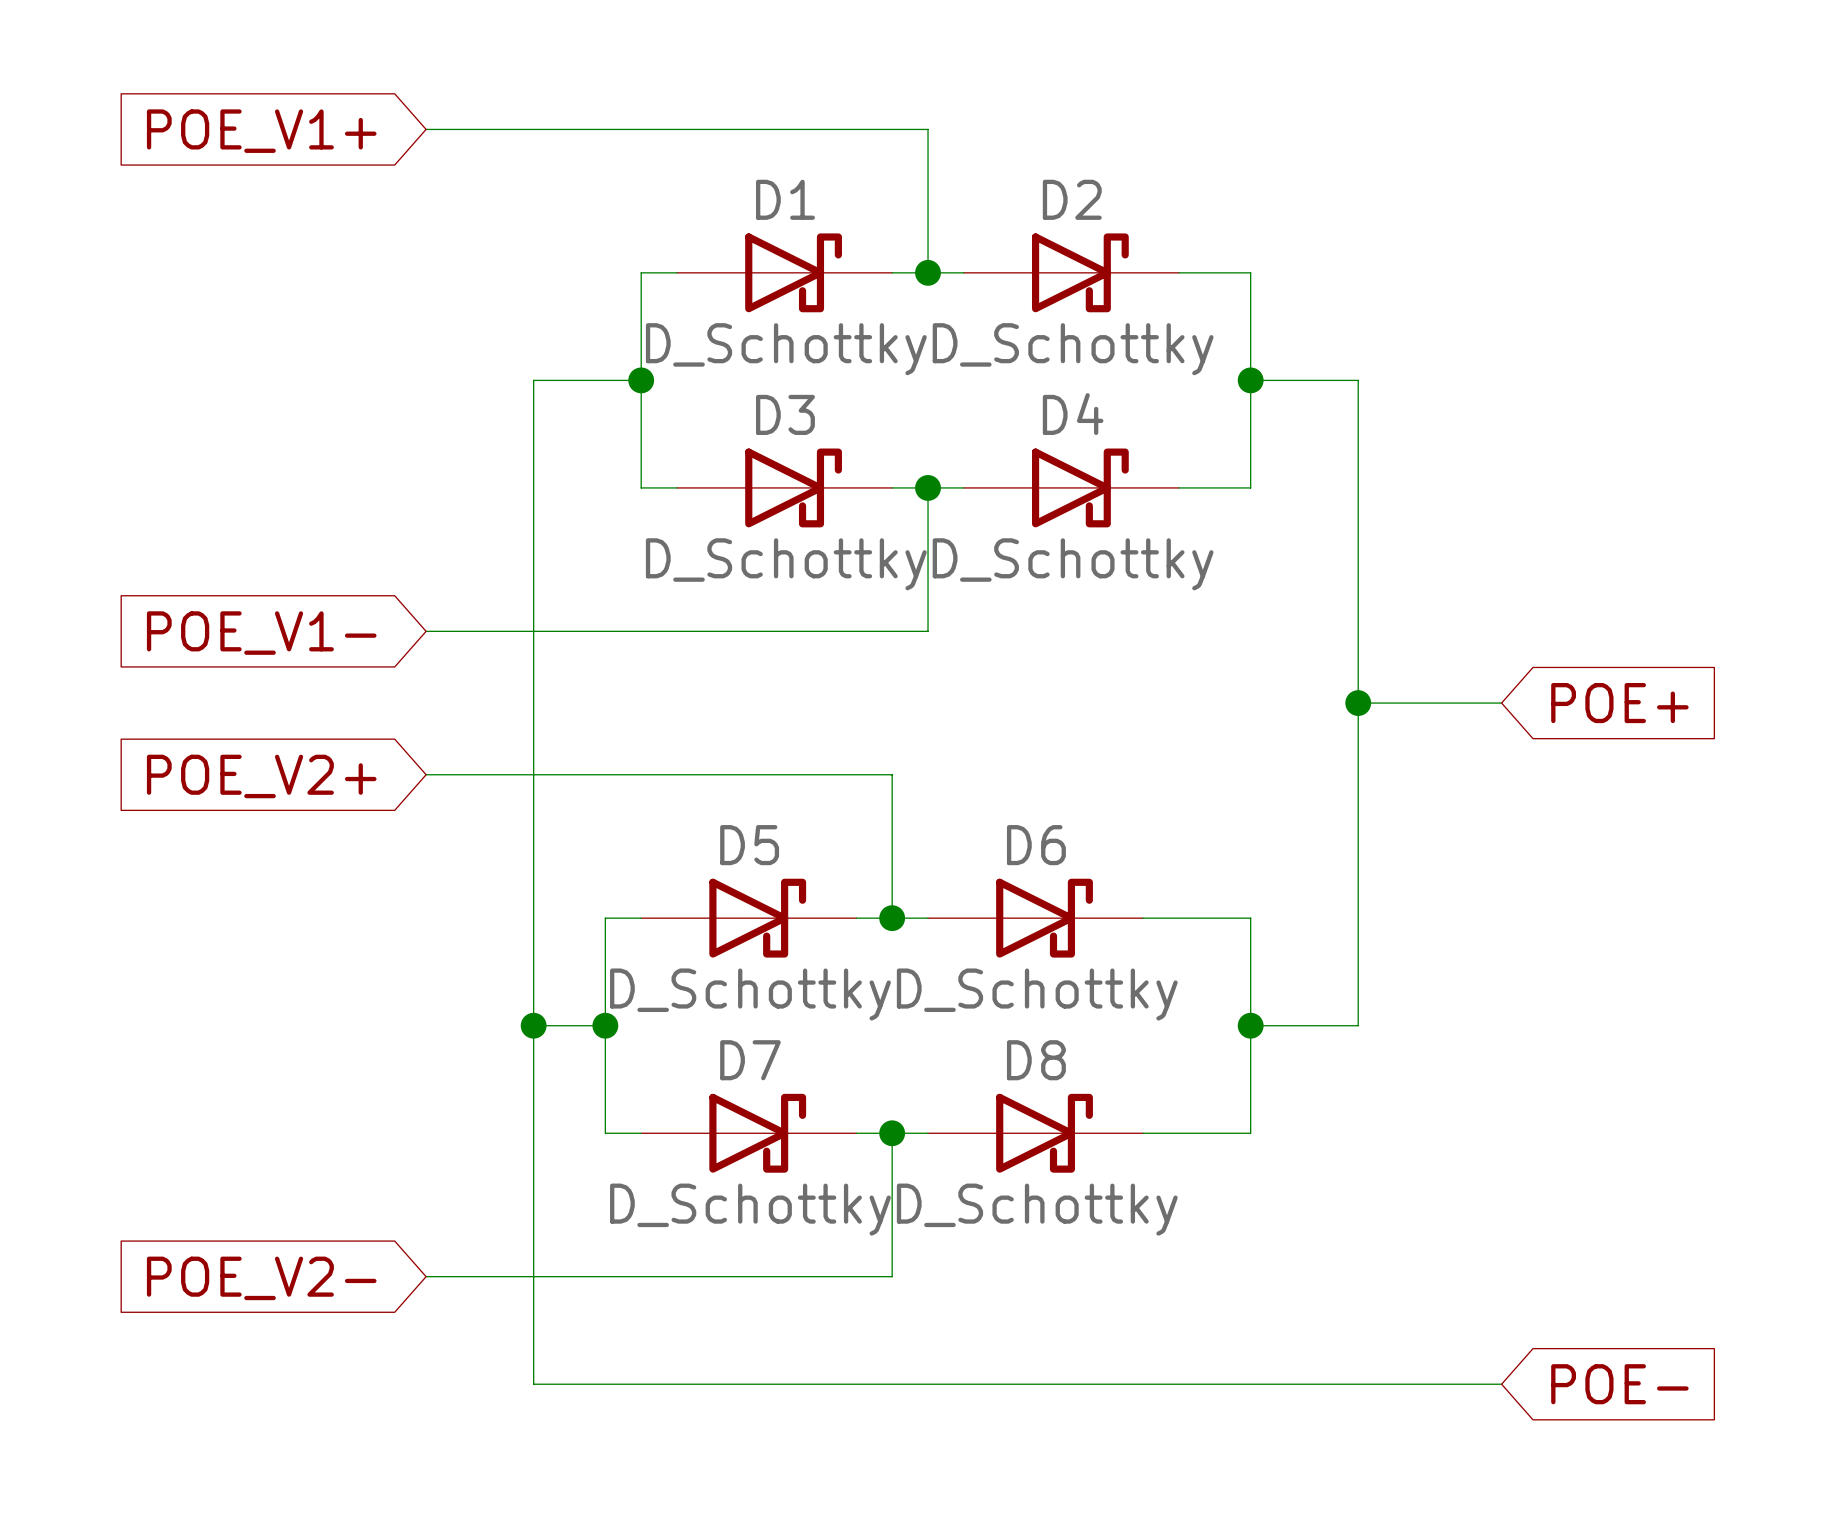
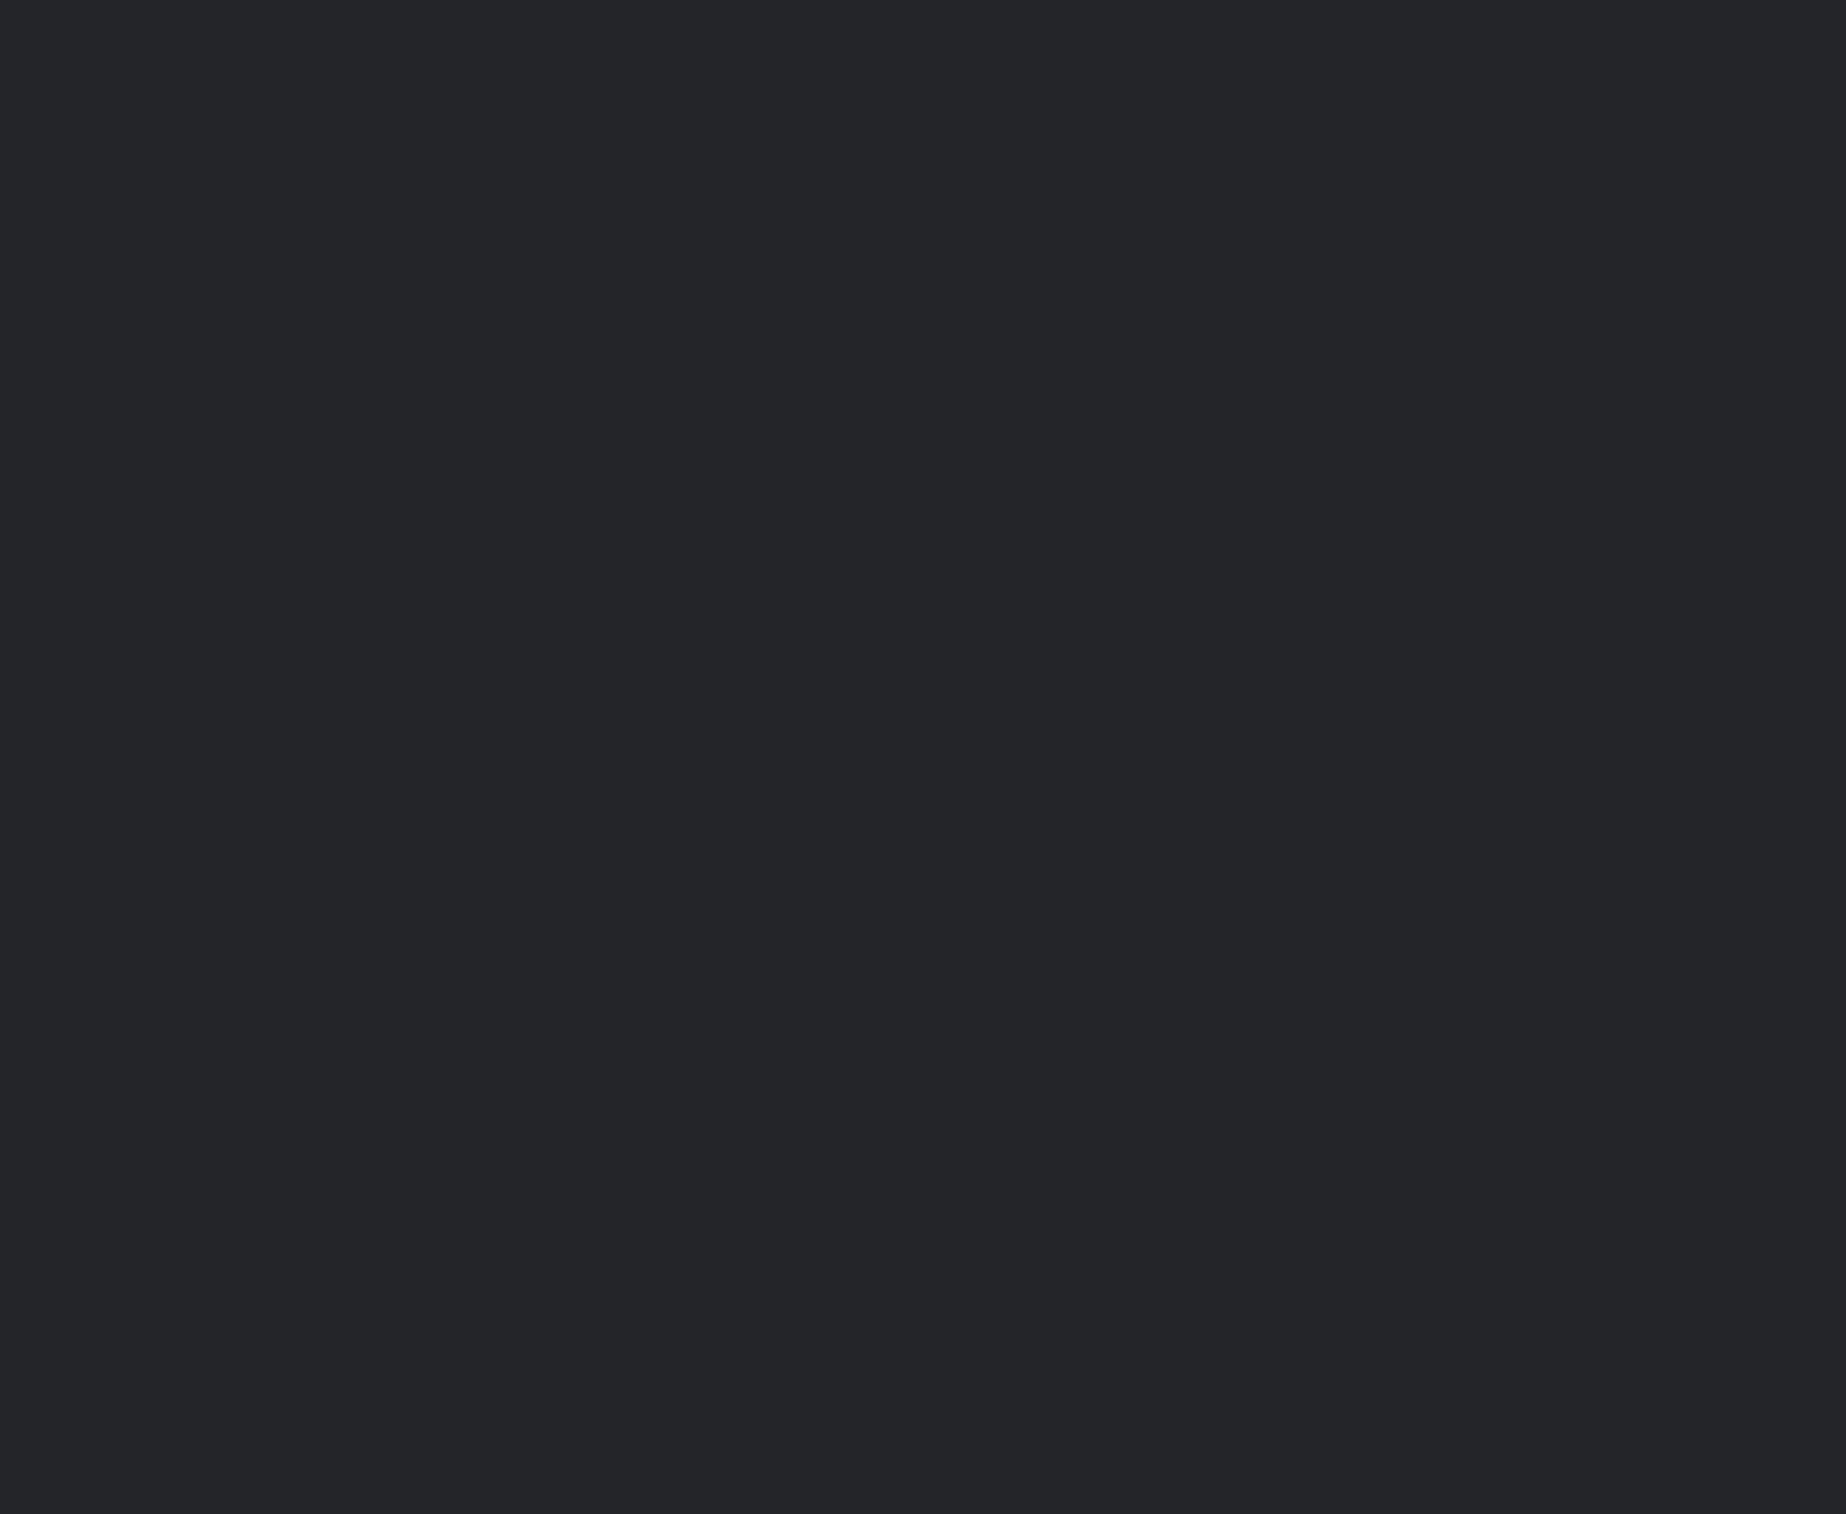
wire: (426, 129) (928, 129) (928, 272) -> none
global label: POE_V1+ (261, 131) -> none
wire: (677, 272) (641, 272) (641, 487) (677, 487) -> none
D1: D_Schottky (784, 272) -> none
wire: (892, 272) (963, 272) -> none
junction: (928, 272) -> none
D2: D_Schottky (1071, 272) -> none
wire: (1178, 272) (1250, 272) (1250, 487) (1178, 487) -> none
wire: (641, 380) (533, 380) (533, 1384) (1501, 1384) -> none
junction: (641, 380) -> none
wire: (1250, 380) (1358, 380) (1358, 1025) (1250, 1025) -> none
junction: (1250, 380) -> none
D3: D_Schottky (784, 487) -> none
wire: (892, 487) (963, 487) -> none
wire: (928, 487) (928, 631) (426, 631) -> none
junction: (928, 487) -> none
D4: D_Schottky (1071, 487) -> none
global label: POE_V1- (261, 633) -> none
wire: (1358, 703) (1501, 703) -> none
junction: (1358, 703) -> none
global label: POE+ (1619, 703) -> none
wire: (426, 774) (892, 774) (892, 918) -> none
global label: POE_V2+ (261, 776) -> none
wire: (641, 918) (605, 918) (605, 1133) (641, 1133) -> none
D5: D_Schottky (748, 918) -> none
wire: (856, 918) (928, 918) -> none
junction: (892, 918) -> none
D6: D_Schottky (1035, 918) -> none
wire: (1143, 918) (1250, 918) (1250, 1133) (1143, 1133) -> none
wire: (533, 1025) (605, 1025) -> none
junction: (533, 1025) -> none
junction: (605, 1025) -> none
junction: (1250, 1025) -> none
D7: D_Schottky (748, 1133) -> none
wire: (856, 1133) (928, 1133) -> none
wire: (892, 1133) (892, 1276) (426, 1276) -> none
junction: (892, 1133) -> none
D8: D_Schottky (1035, 1133) -> none
global label: POE_V2- (261, 1278) -> none
global label: POE- (1619, 1384) -> none

